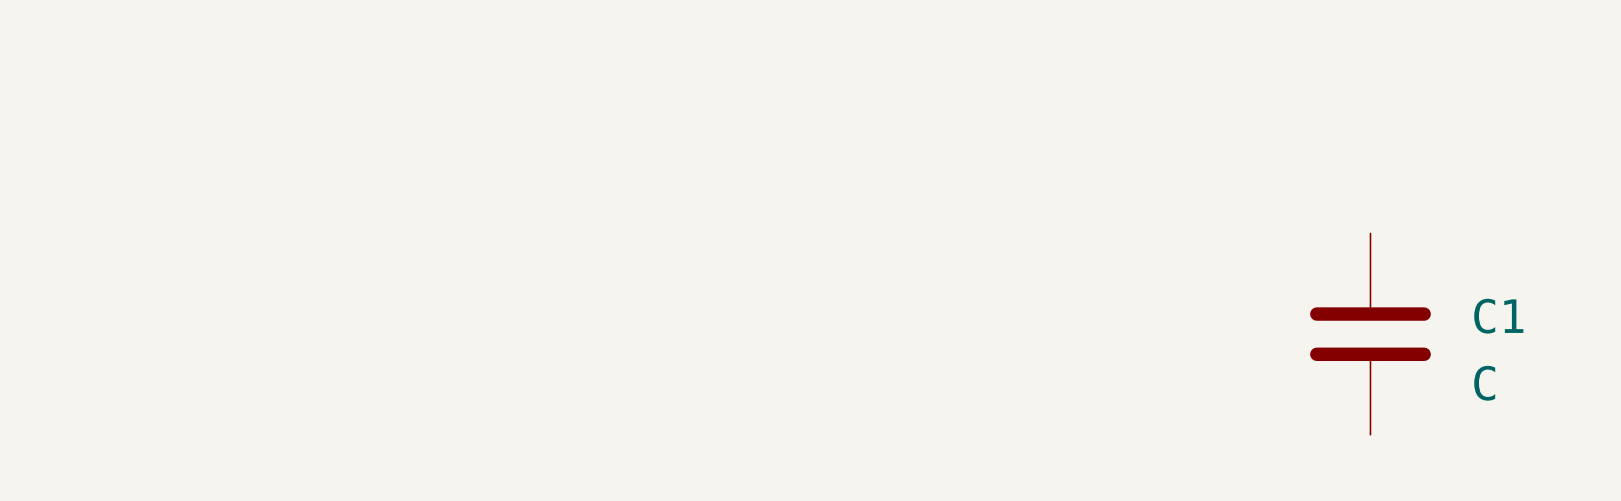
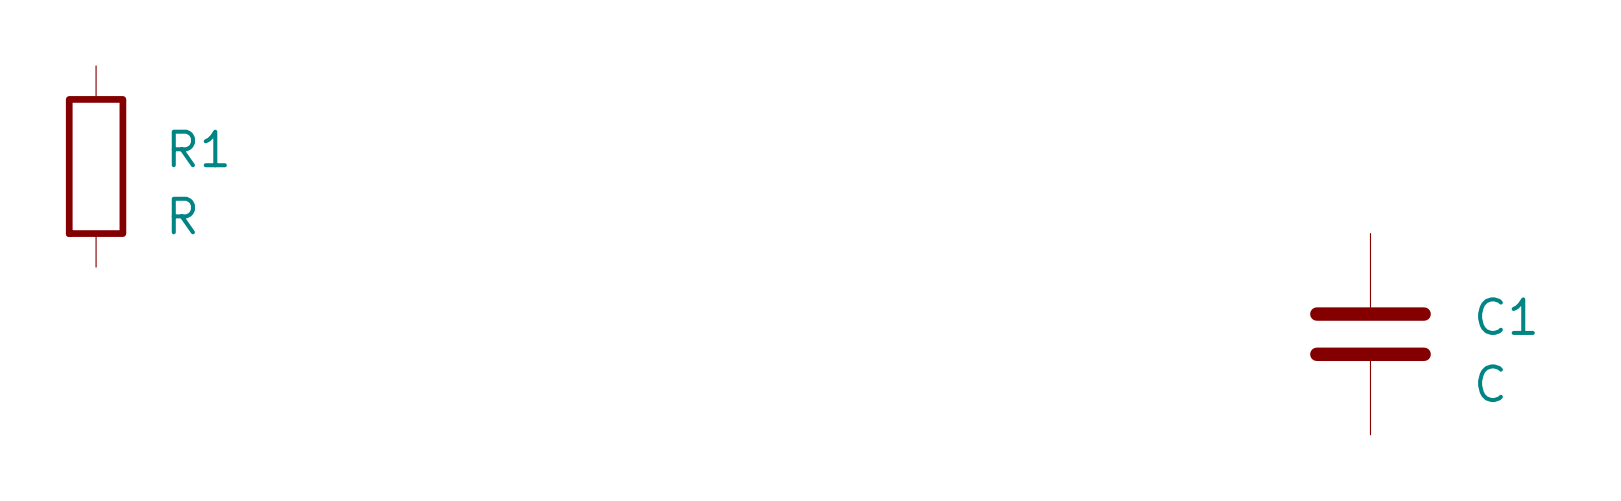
R1: none -> R (96, 166)

